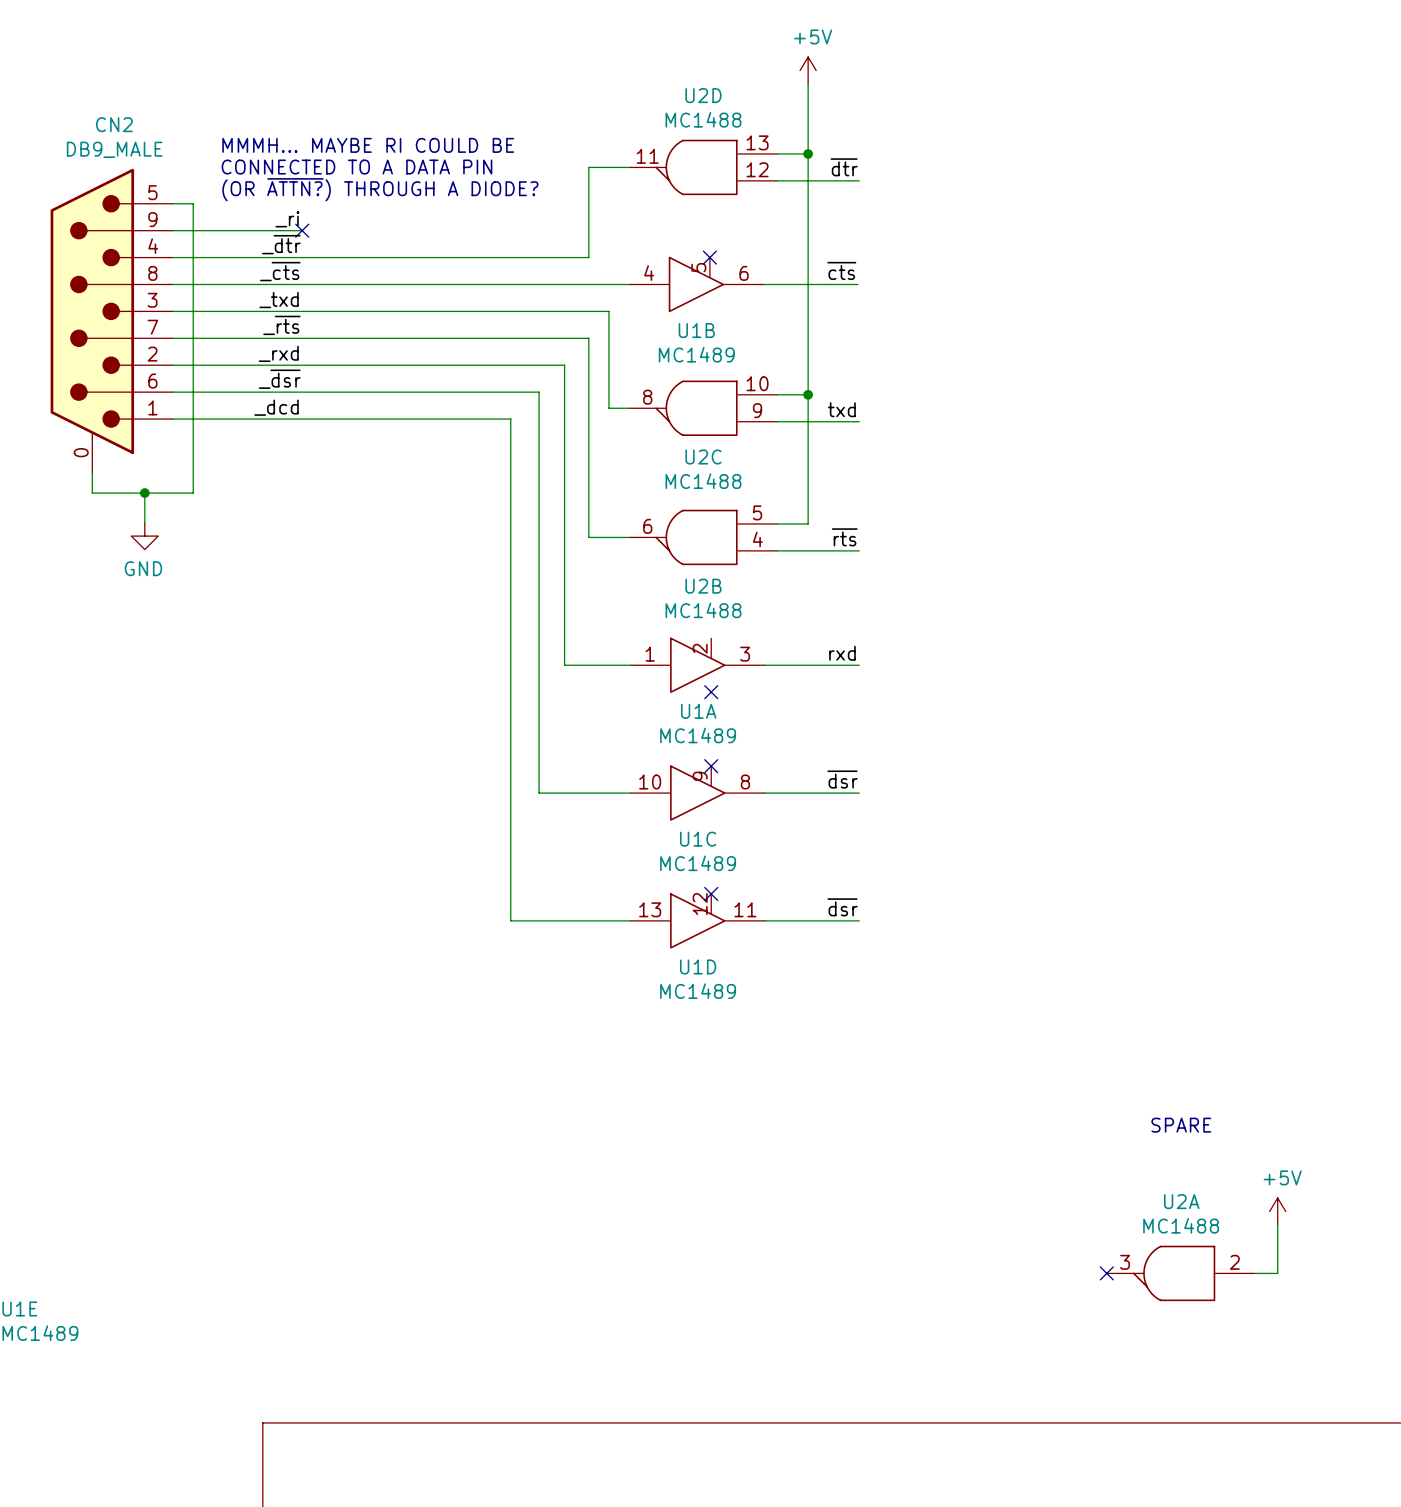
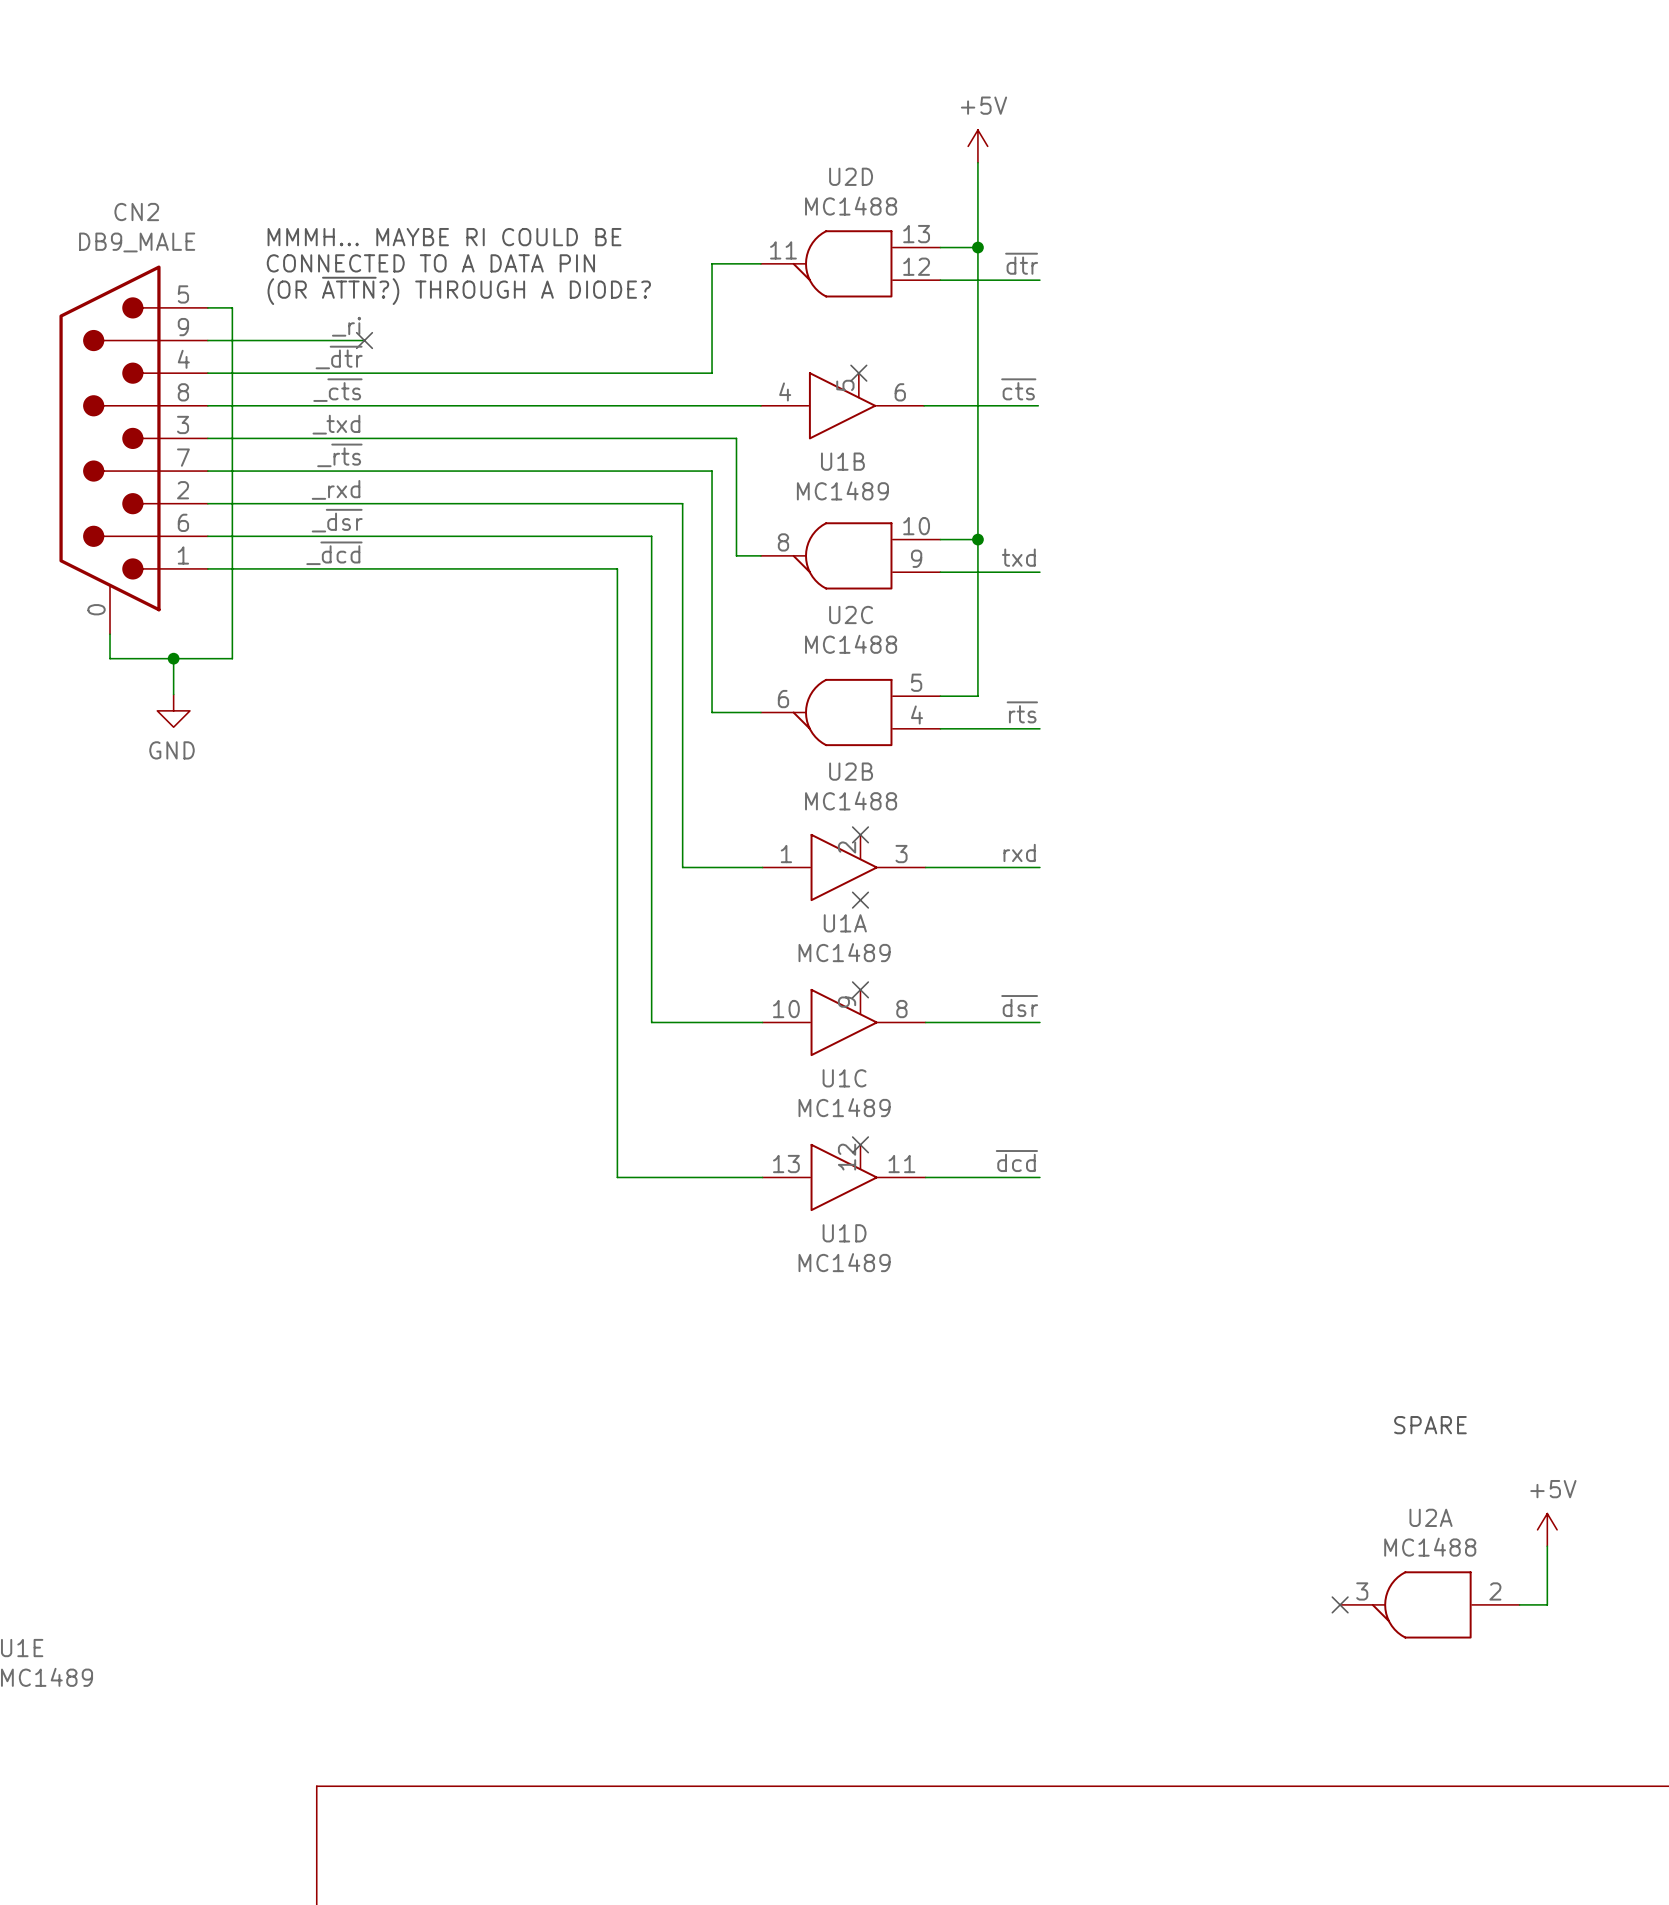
text: (OR ~{ATTN?}) THROUGH A DIODE? (380, 189) -> (OR ~{ATTN}?) THROUGH A DIODE? (459, 290)
label: _dcd (276, 407) -> _~{dcd} (334, 553)
no-connect mark: none -> (860, 834)
label: ~{dsr} (842, 907) -> ~{dcd} (1016, 1161)

